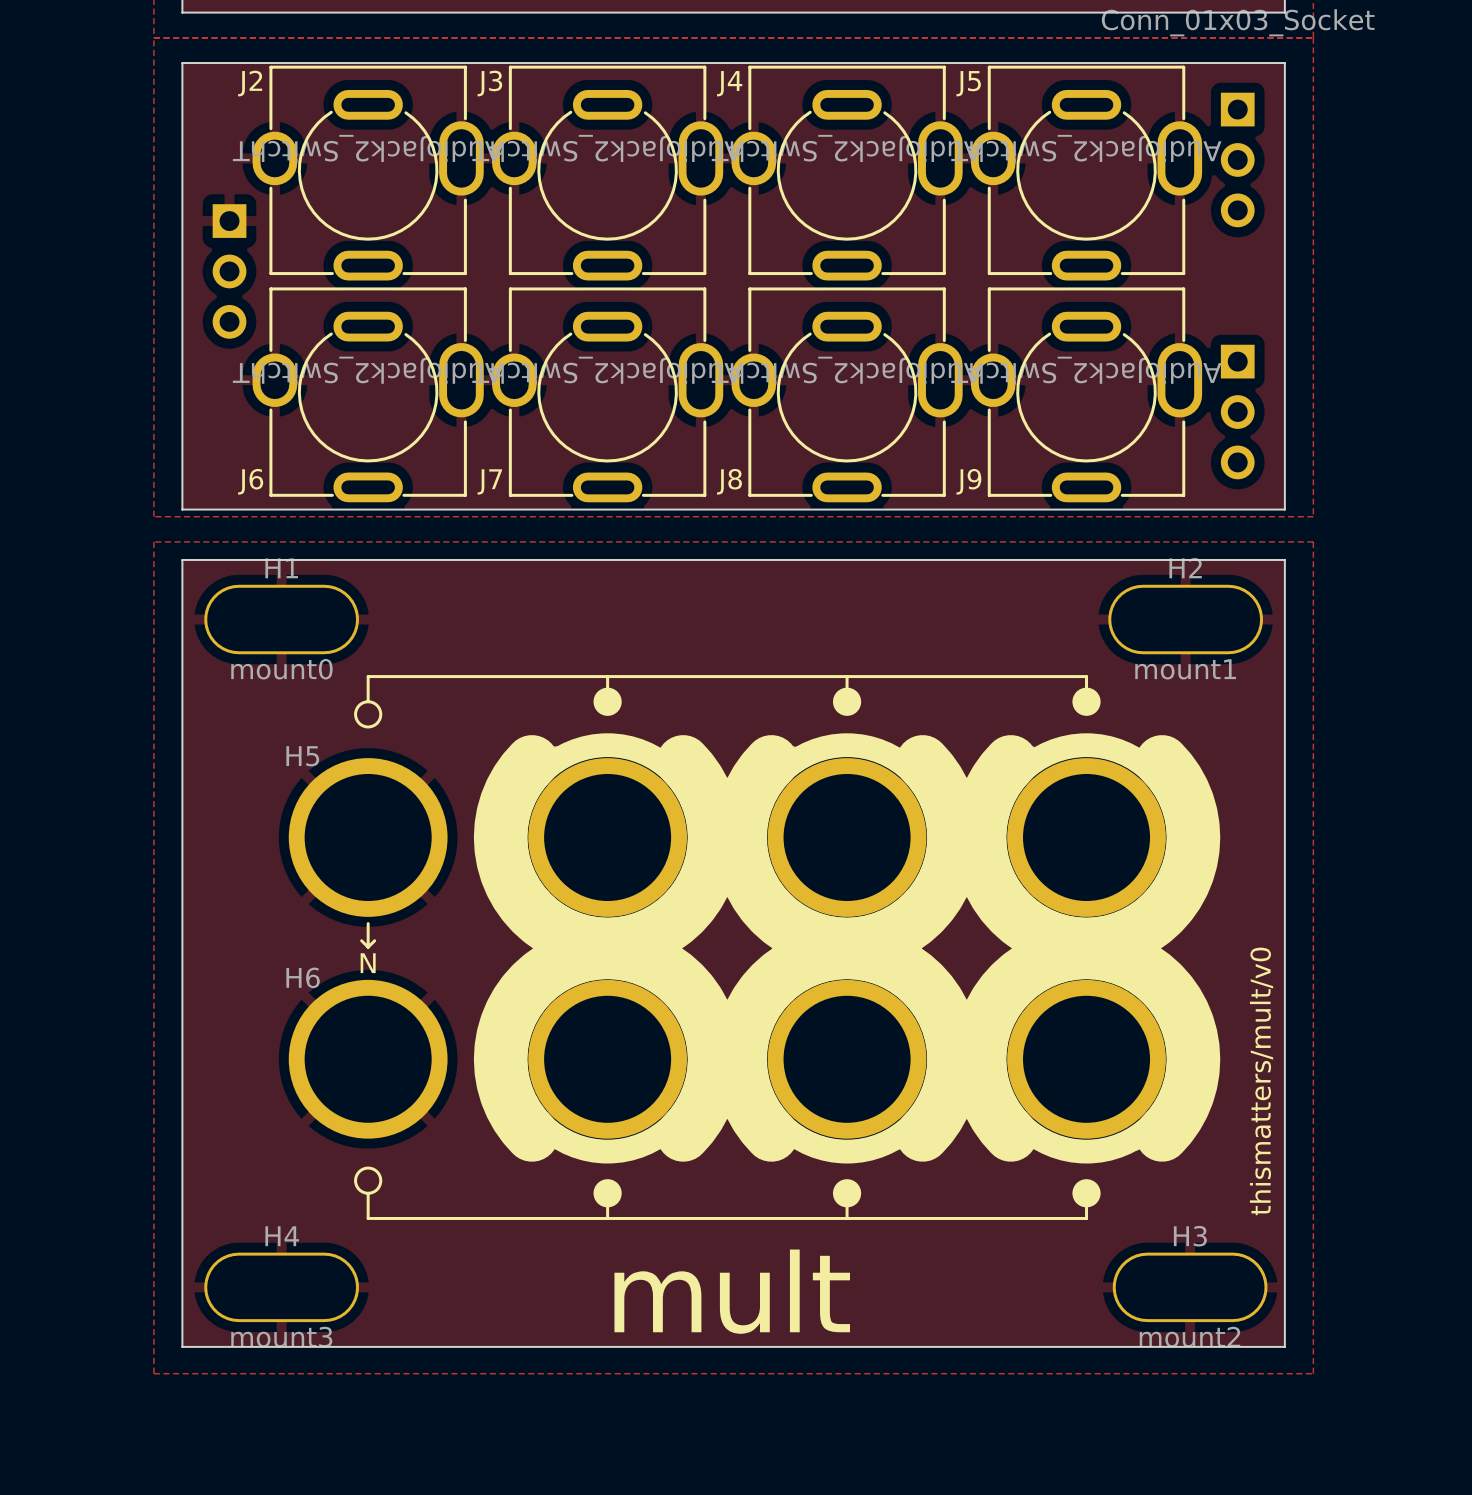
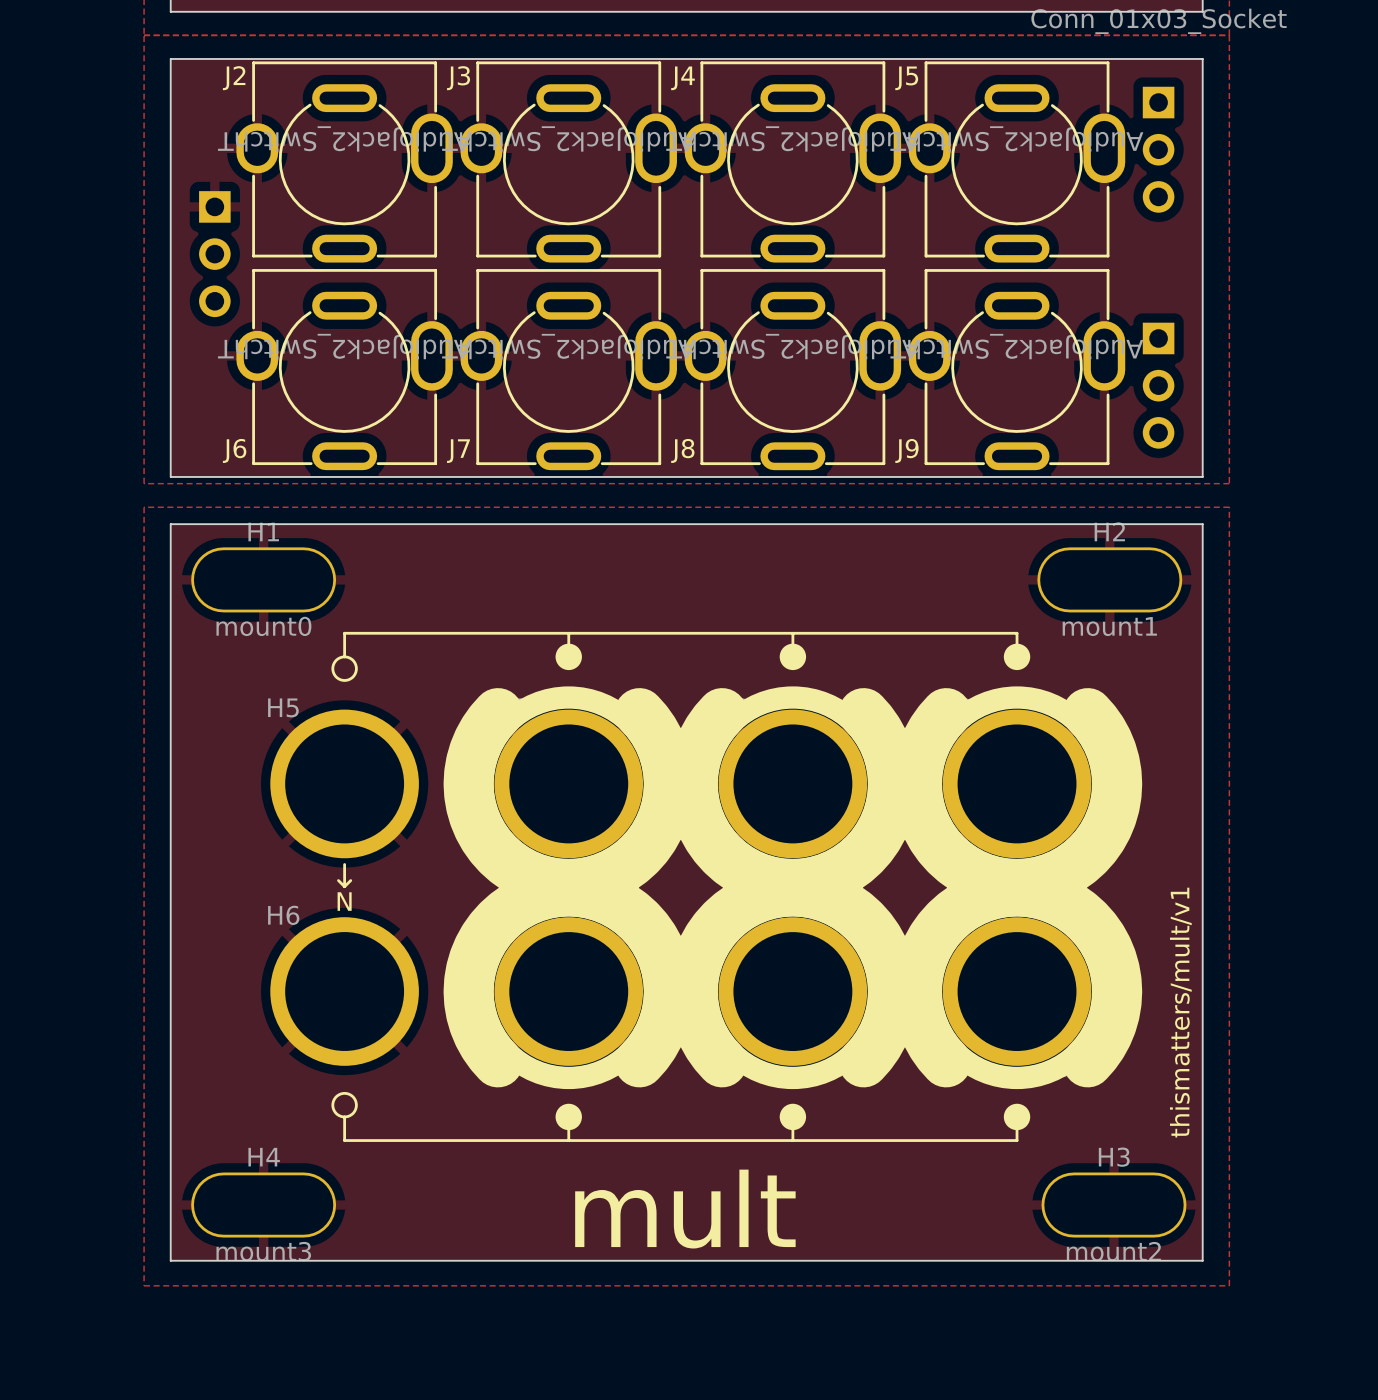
text: thismatters/mult/v0 (1261, 1081) -> thismatters/mult/v1 (1180, 1012)

